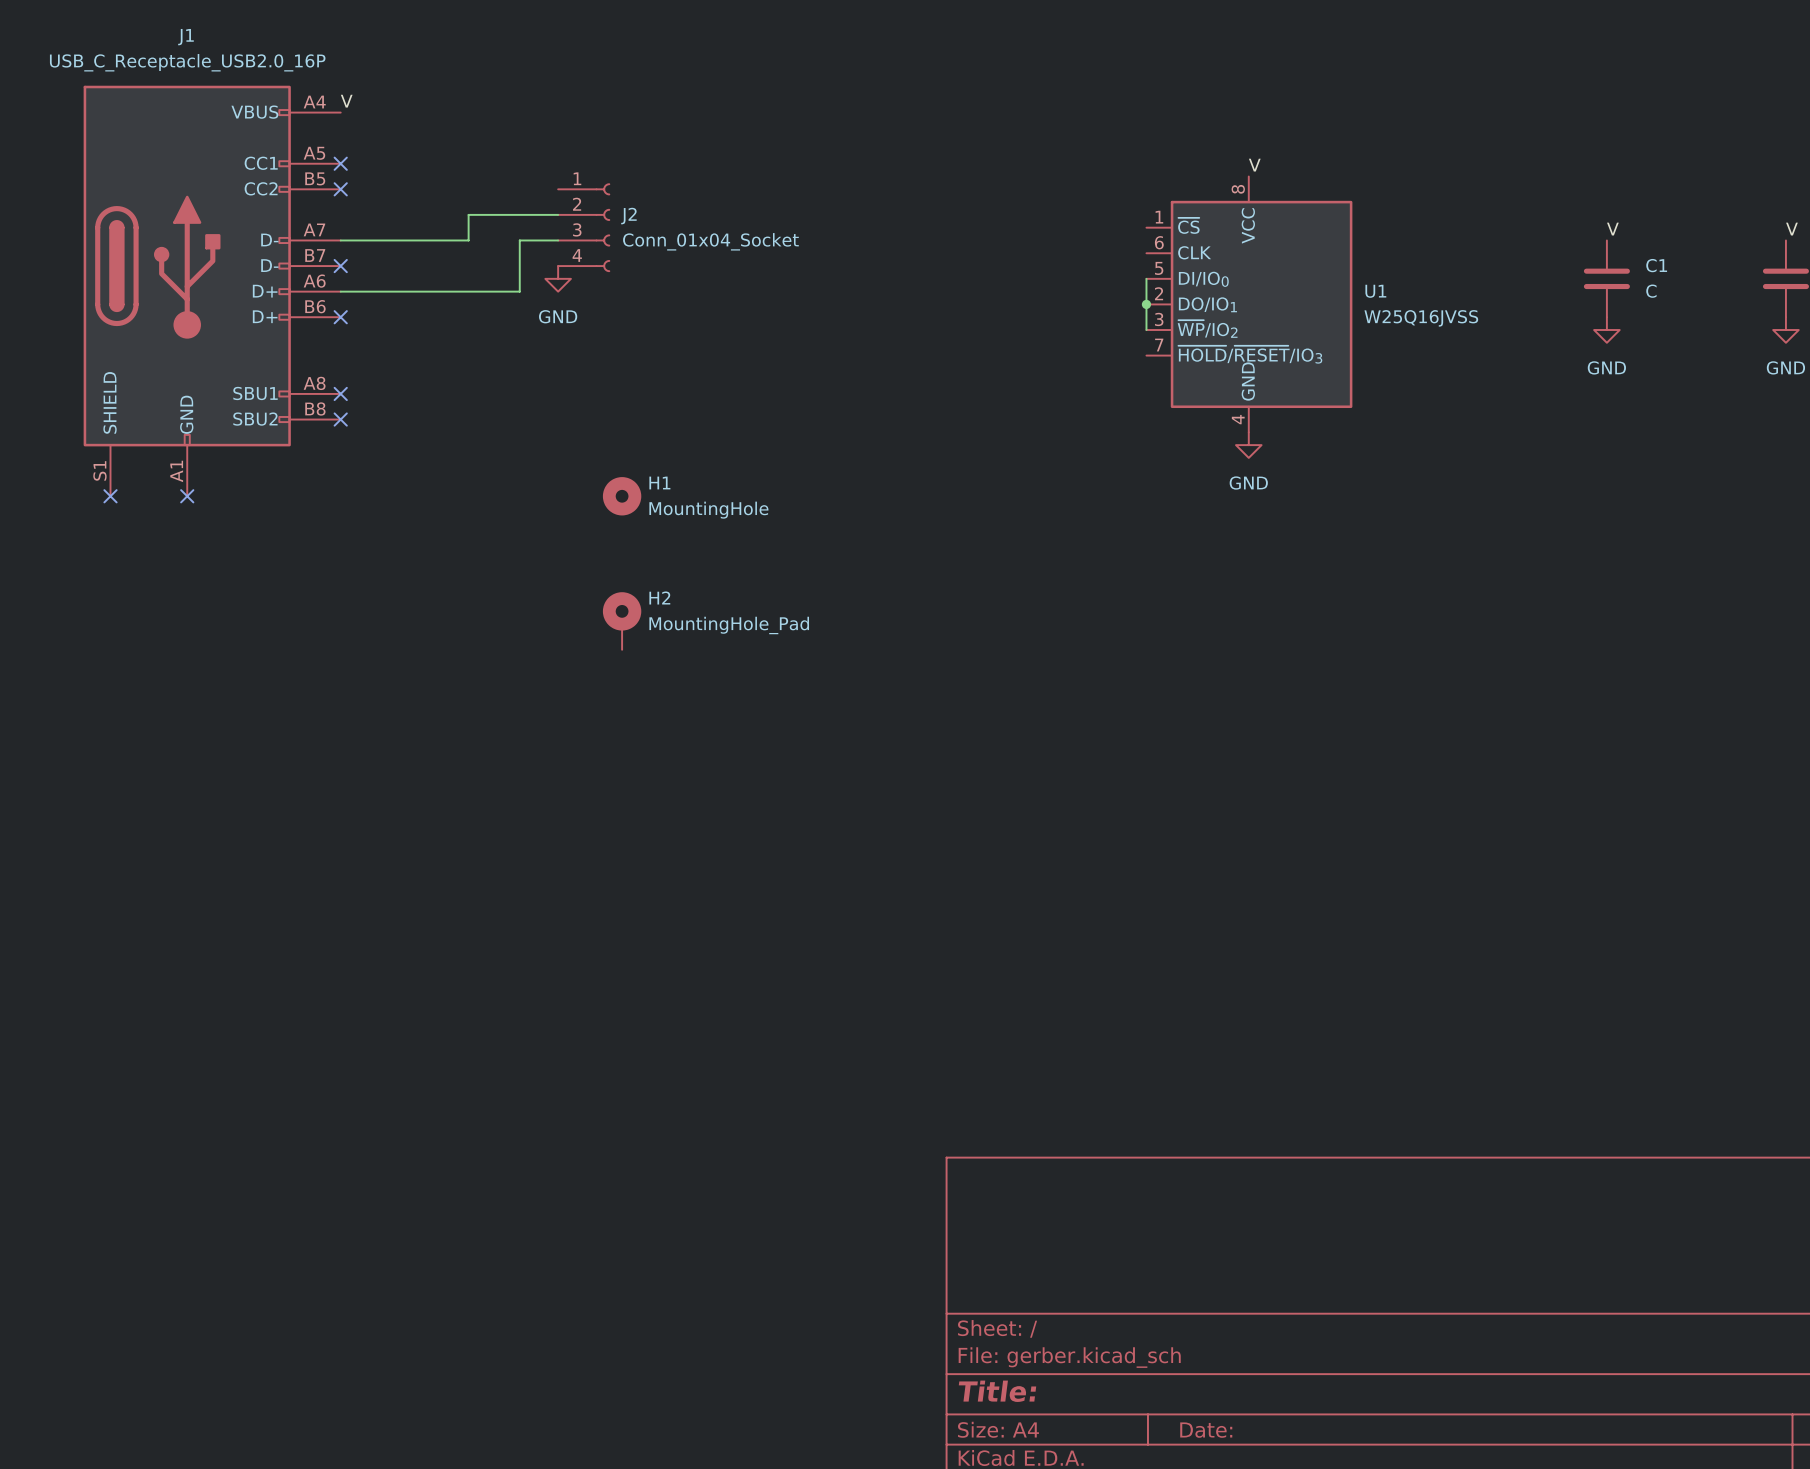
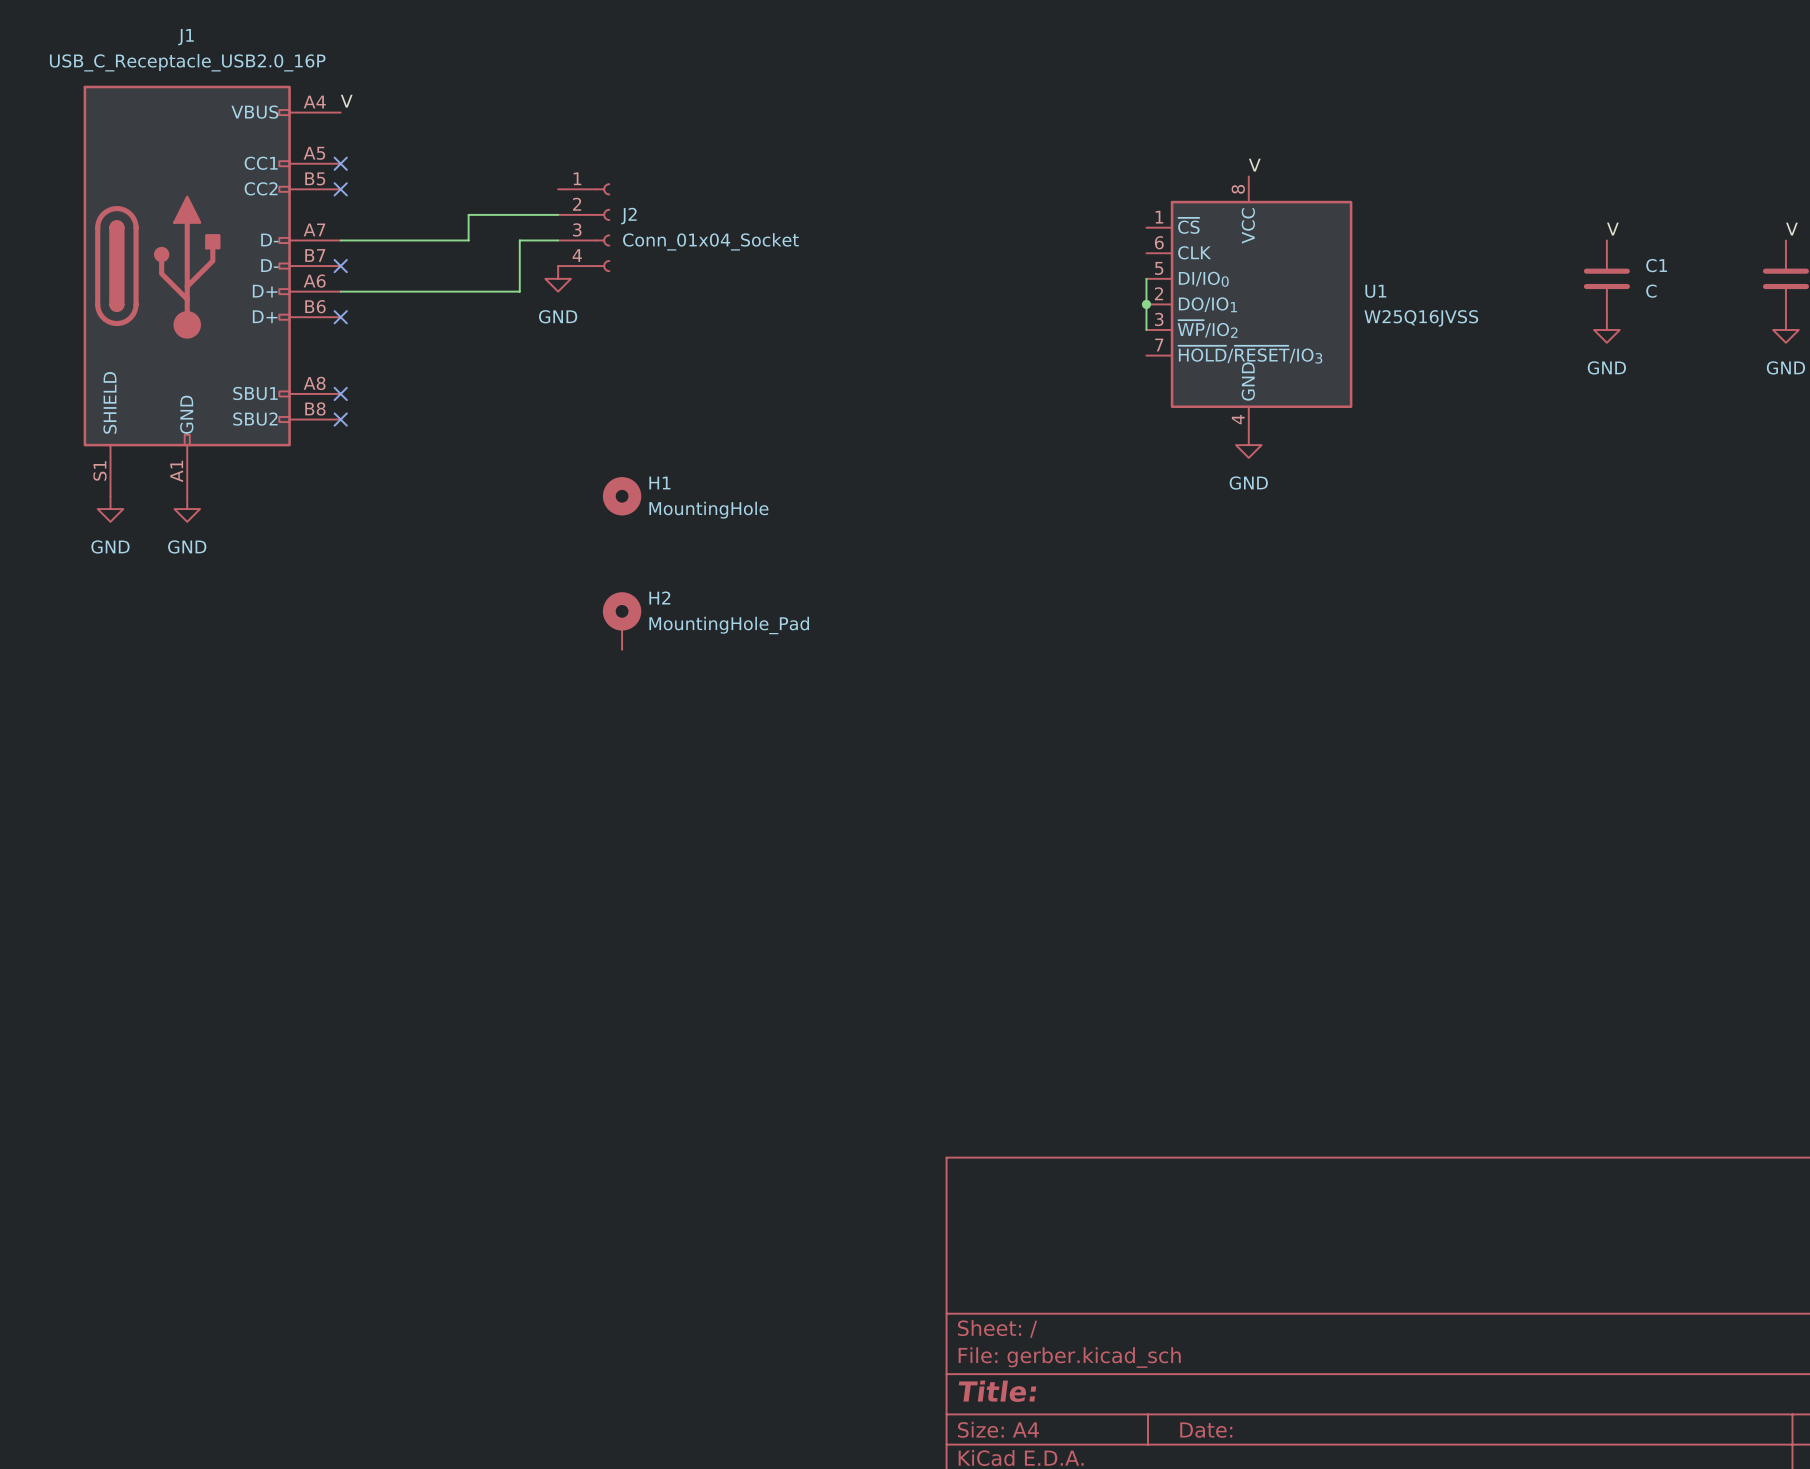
no-connect mark: (110, 496) -> none
no-connect mark: (187, 496) -> none
power symbol: none -> GND (110, 509)
power symbol: none -> GND (187, 509)

